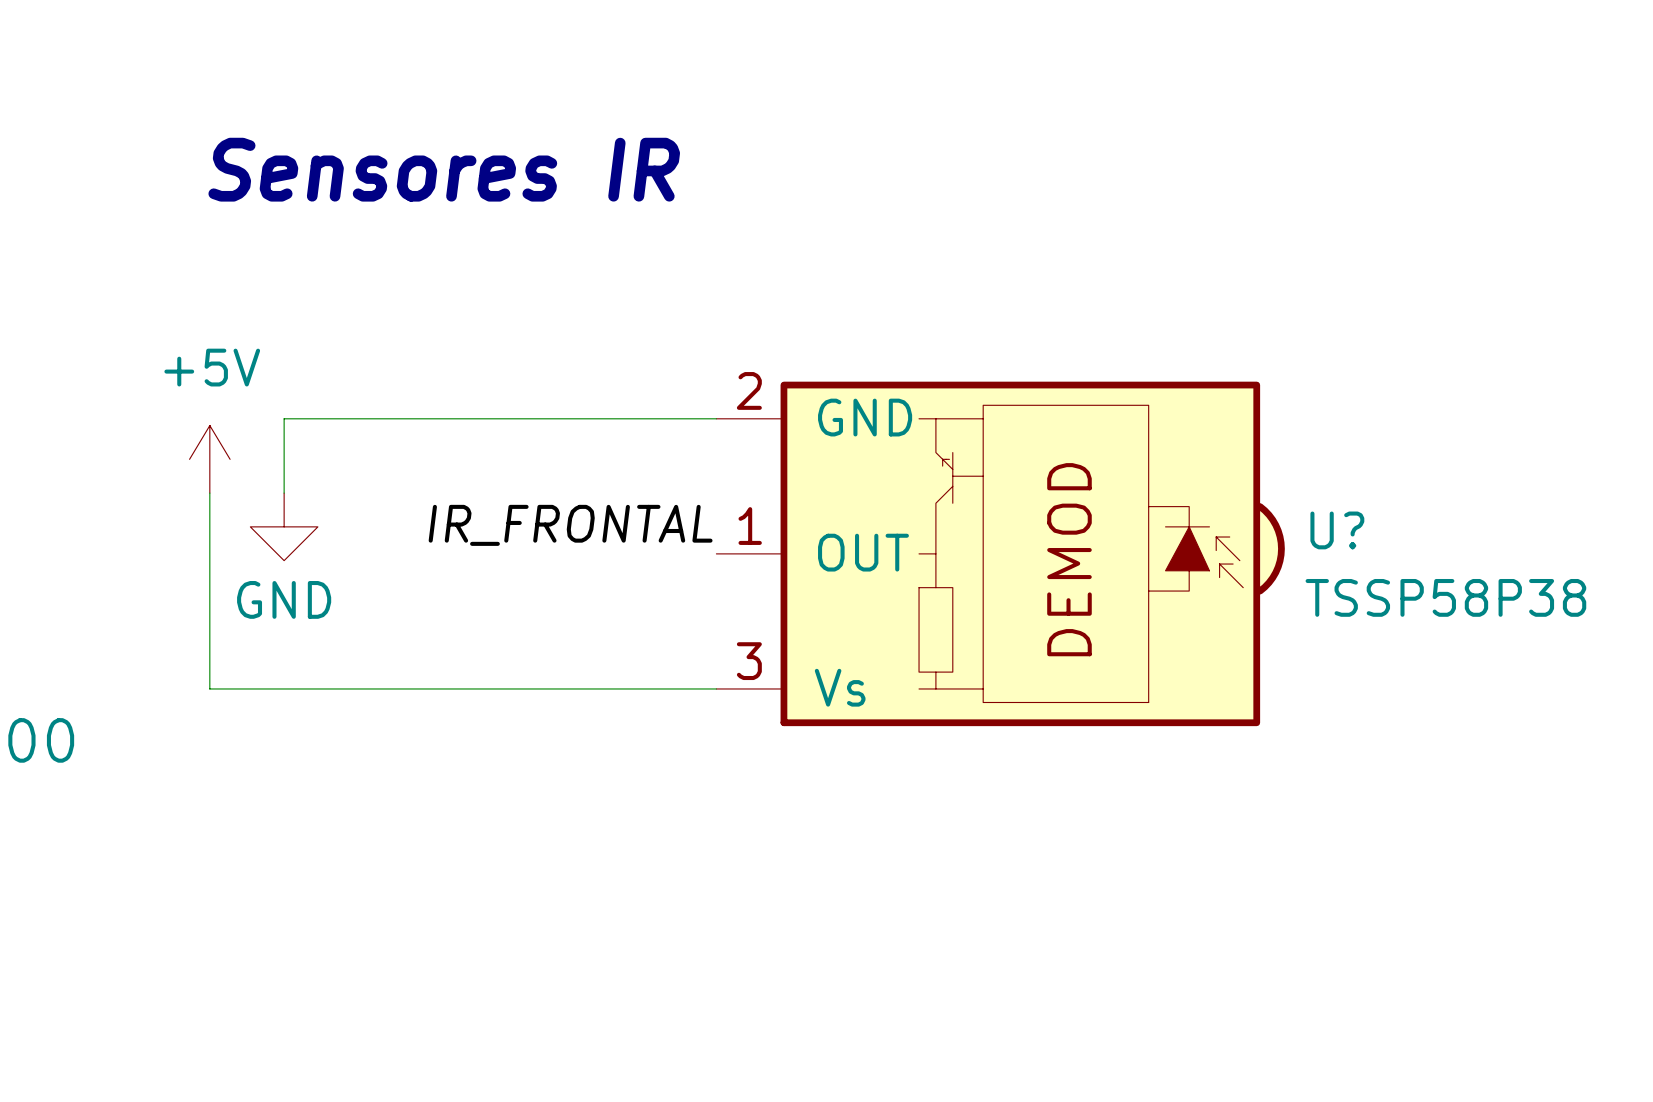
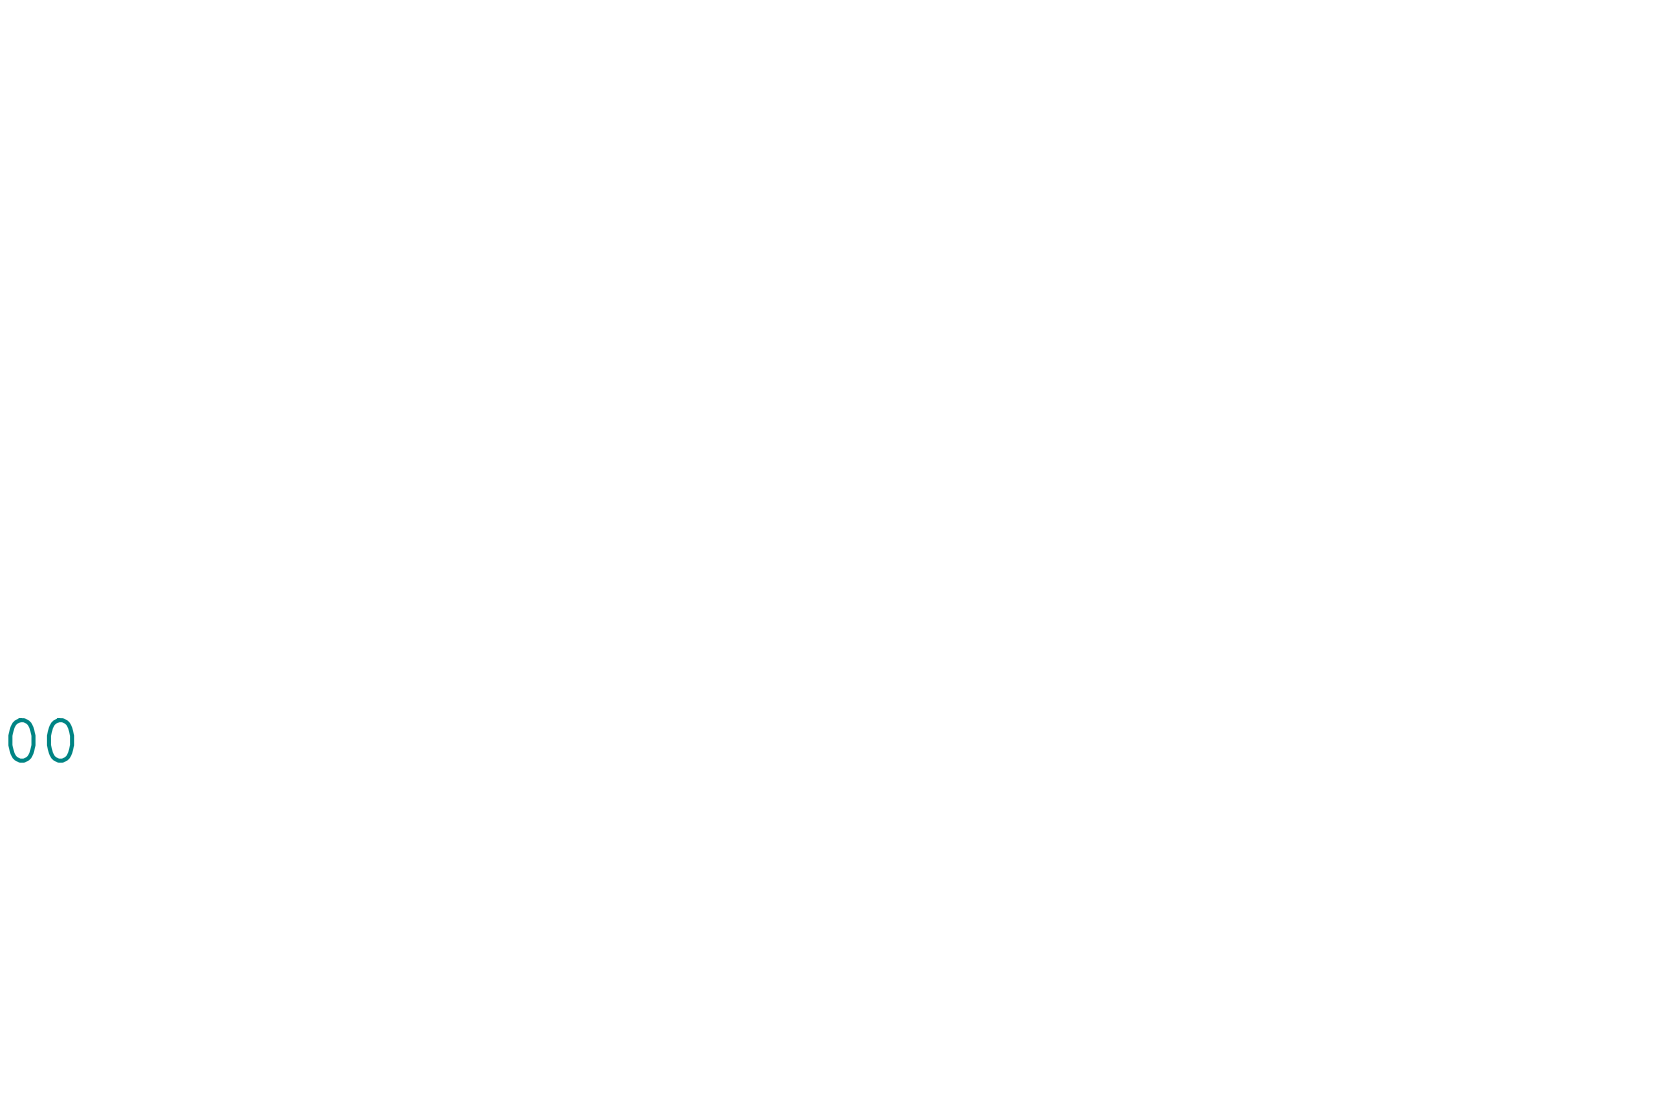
text: Sensores IR (444, 169) -> none
wire: (716, 418) (284, 418) (284, 493) -> none
power symbol: +5V (209, 459) -> none
wire: (209, 493) (209, 688) (716, 688) -> none
label: IR_FRONTAL (570, 525) -> none
power symbol: GND (284, 526) -> none
U?: TSSP58P38 (1000, 553) -> none

